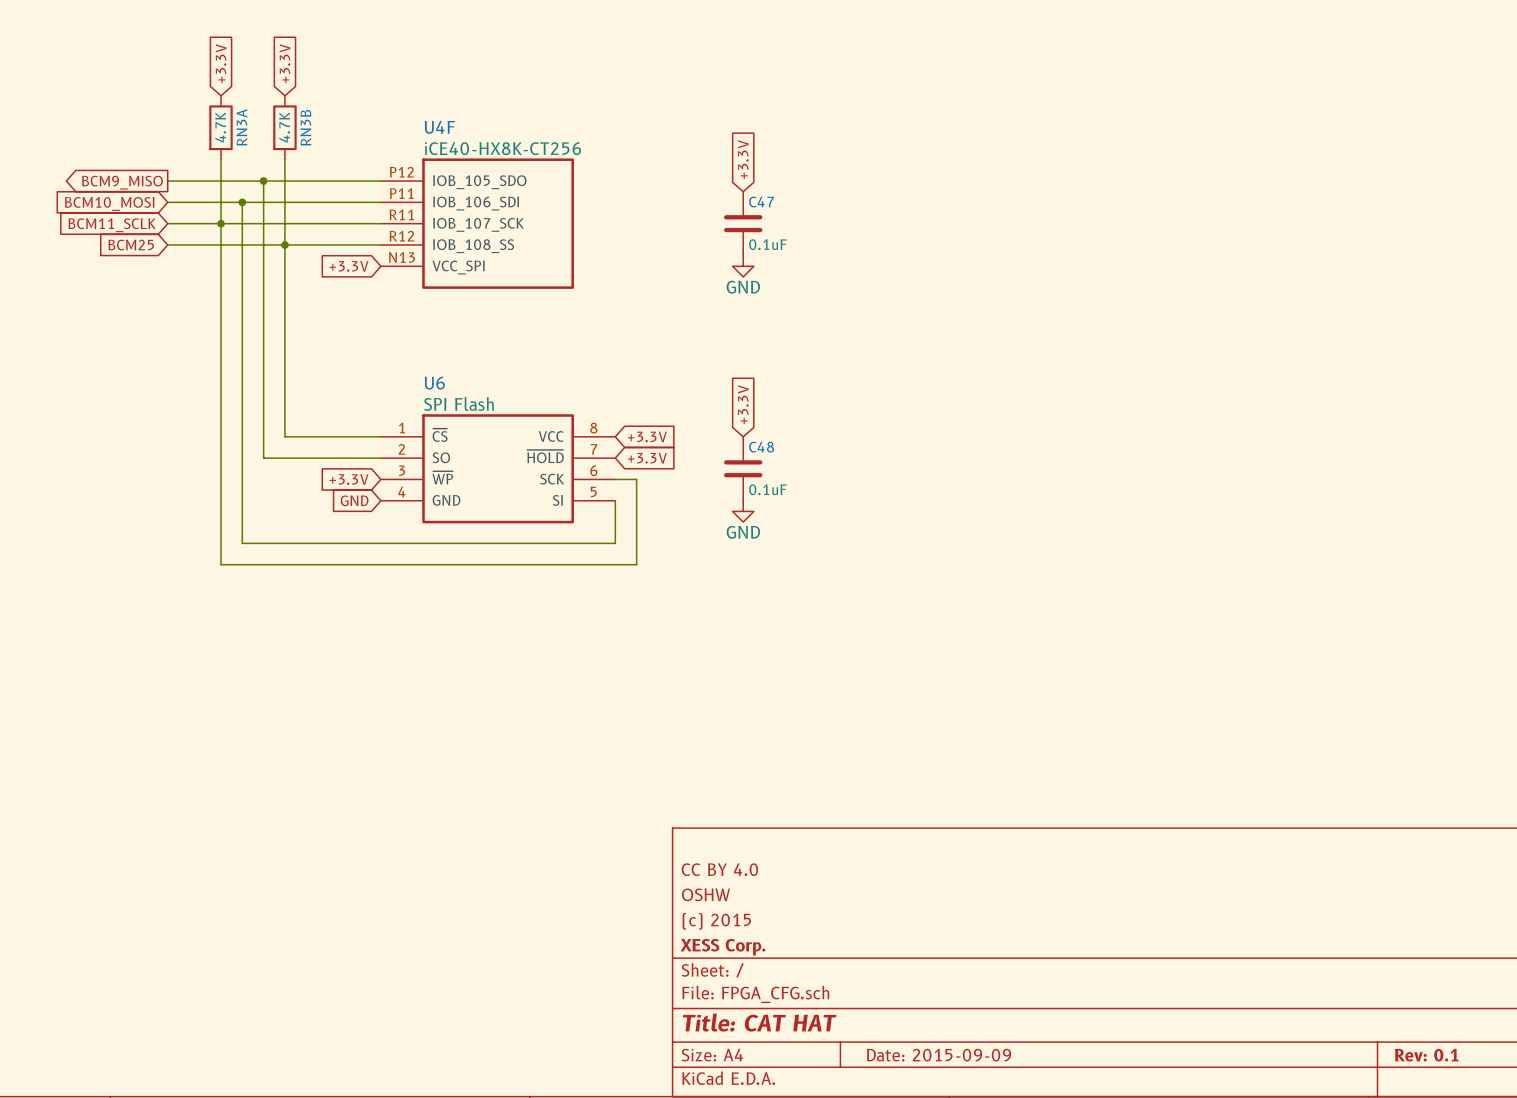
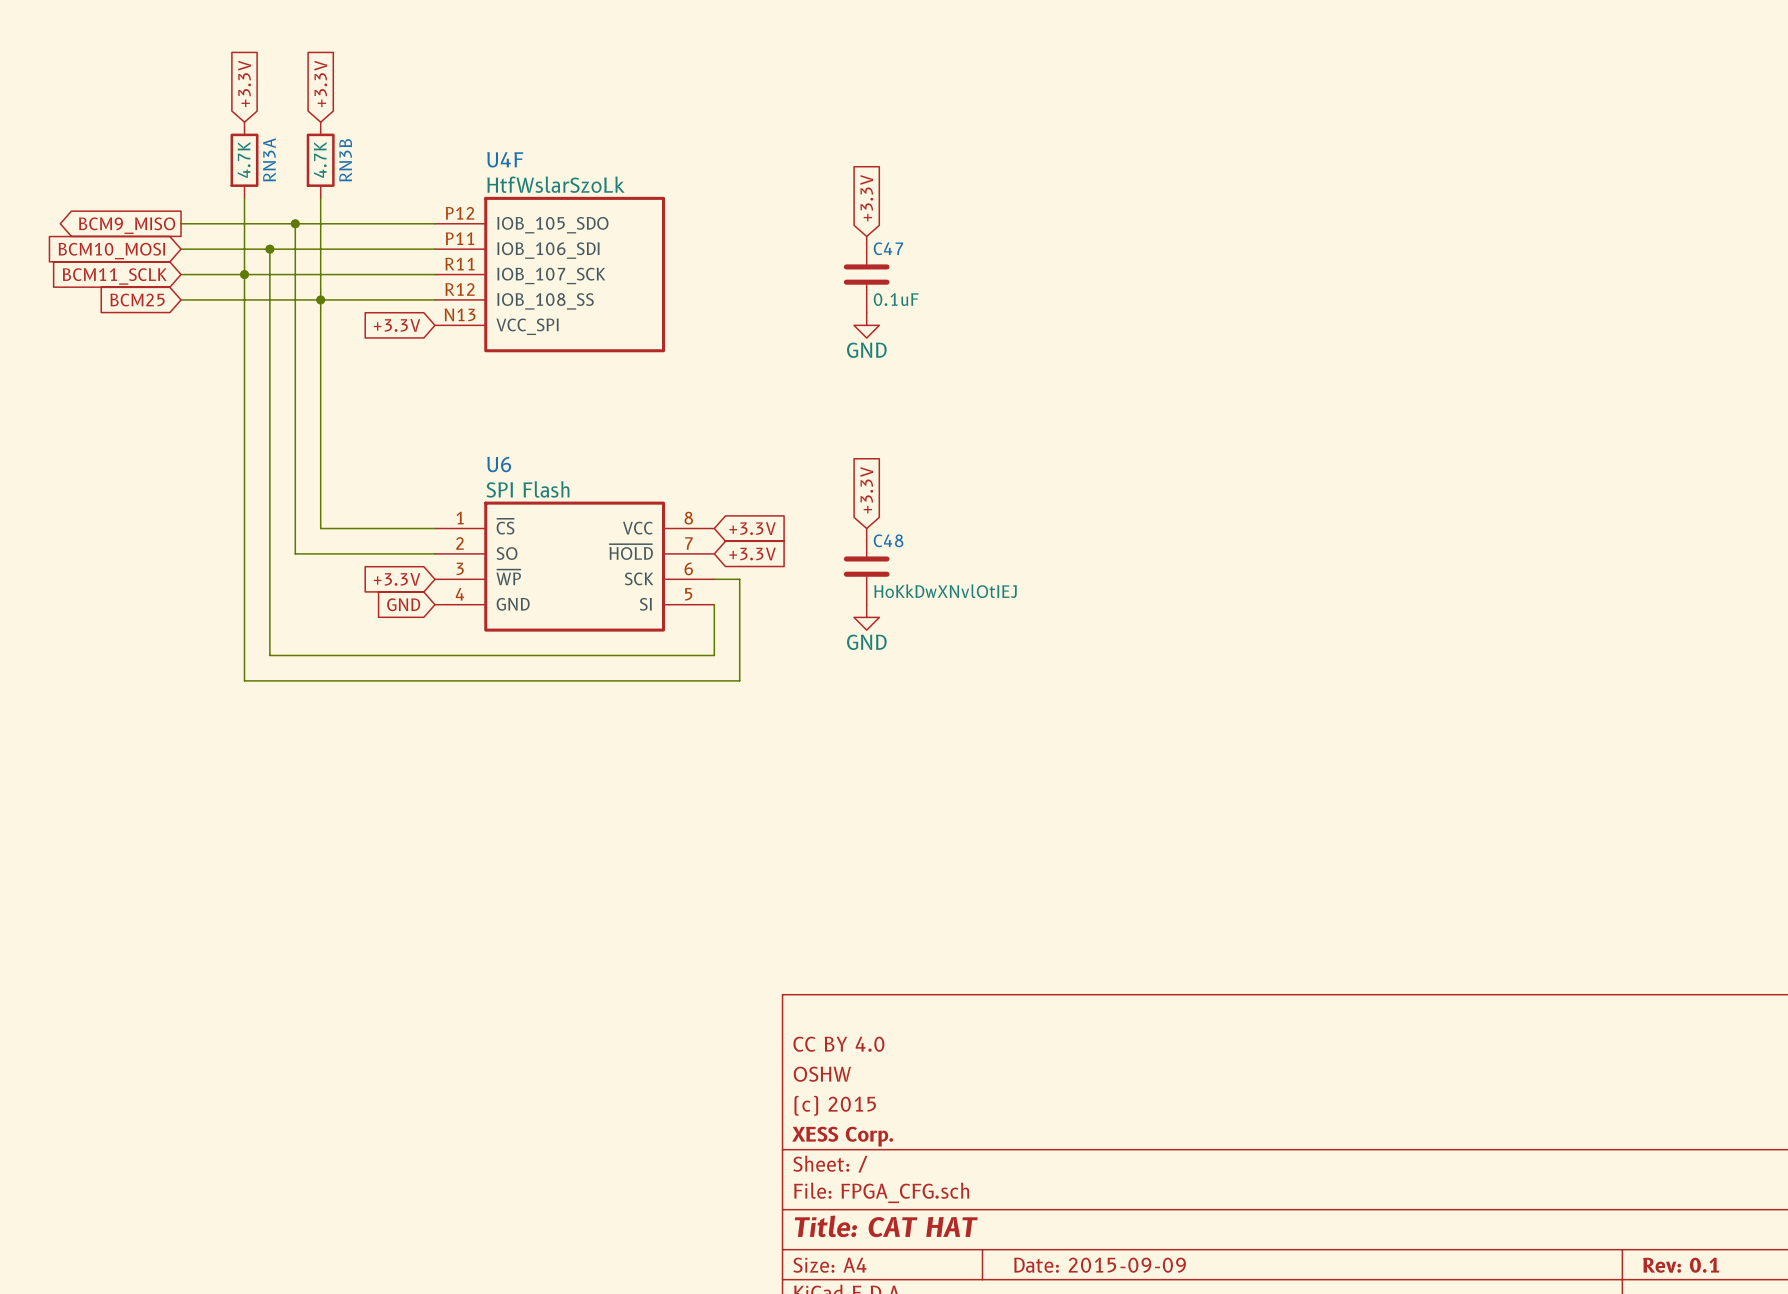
U4F value: iCE40-HX8K-CT256 (503, 148) -> HtfWslarSzoLk (555, 184)
C48 value: 0.1uF (767, 489) -> HoKkDwXNvlOtIEJ (945, 591)

